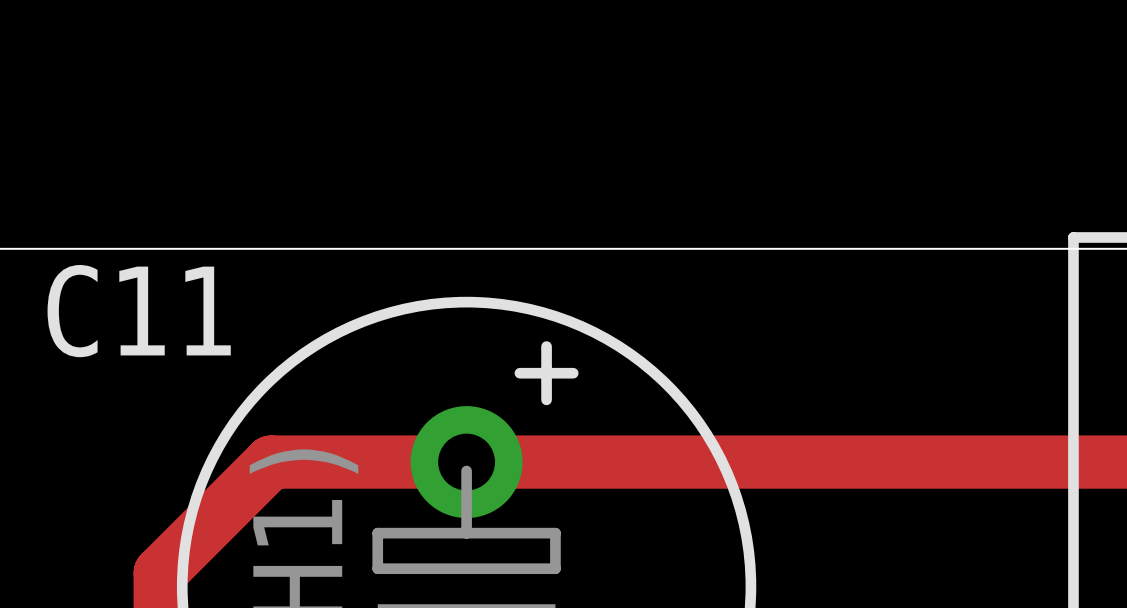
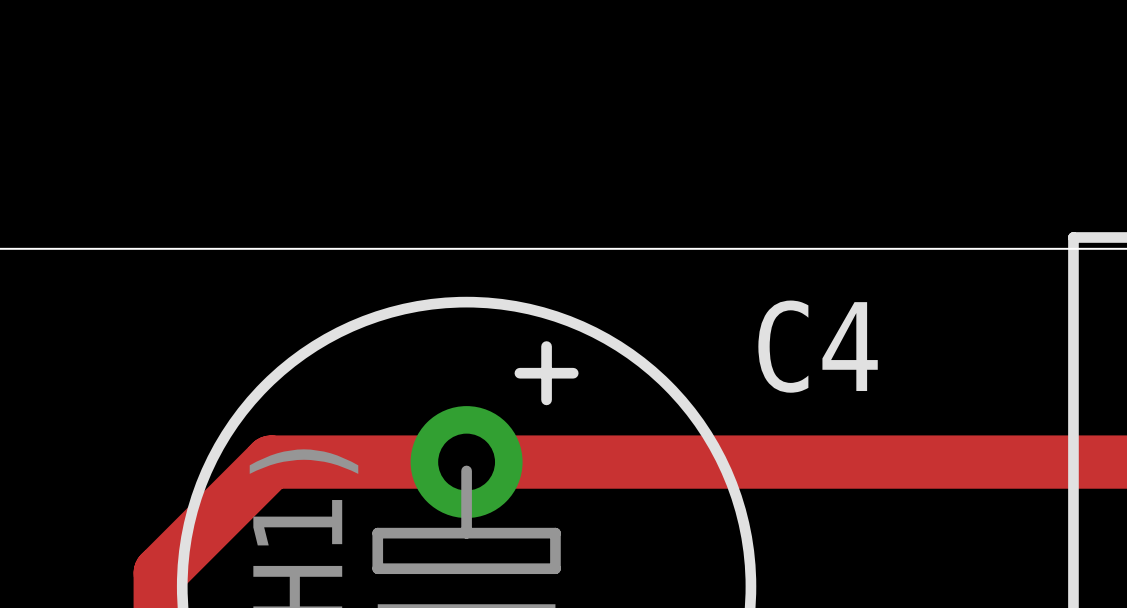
C11 name: C11 (139, 311) -> C4 (818, 346)

